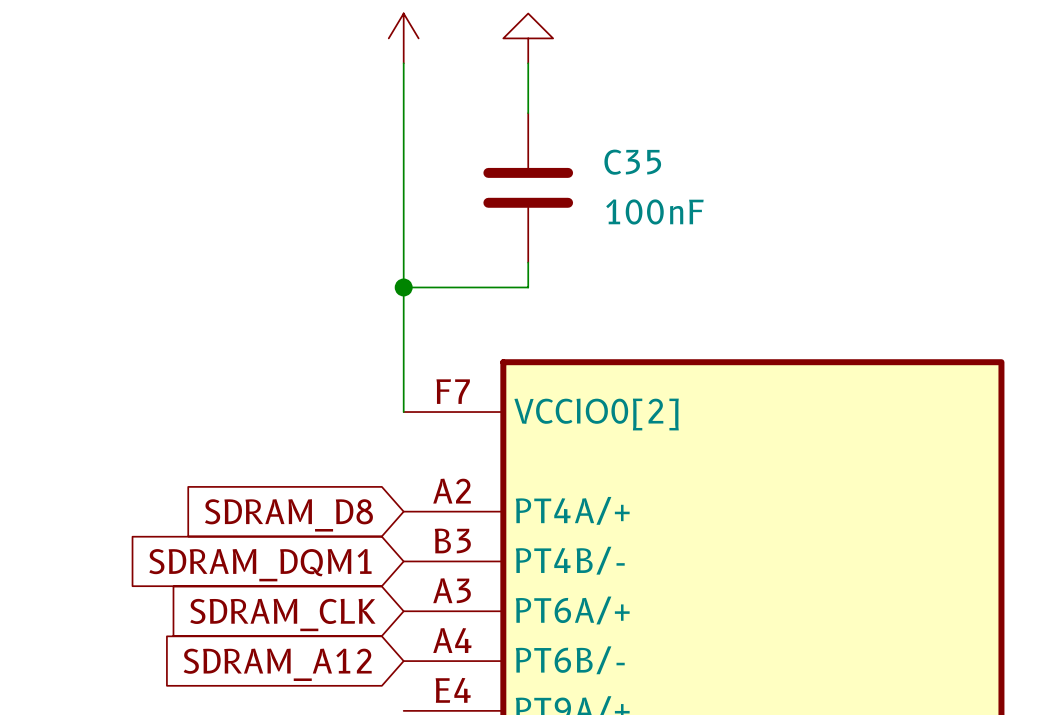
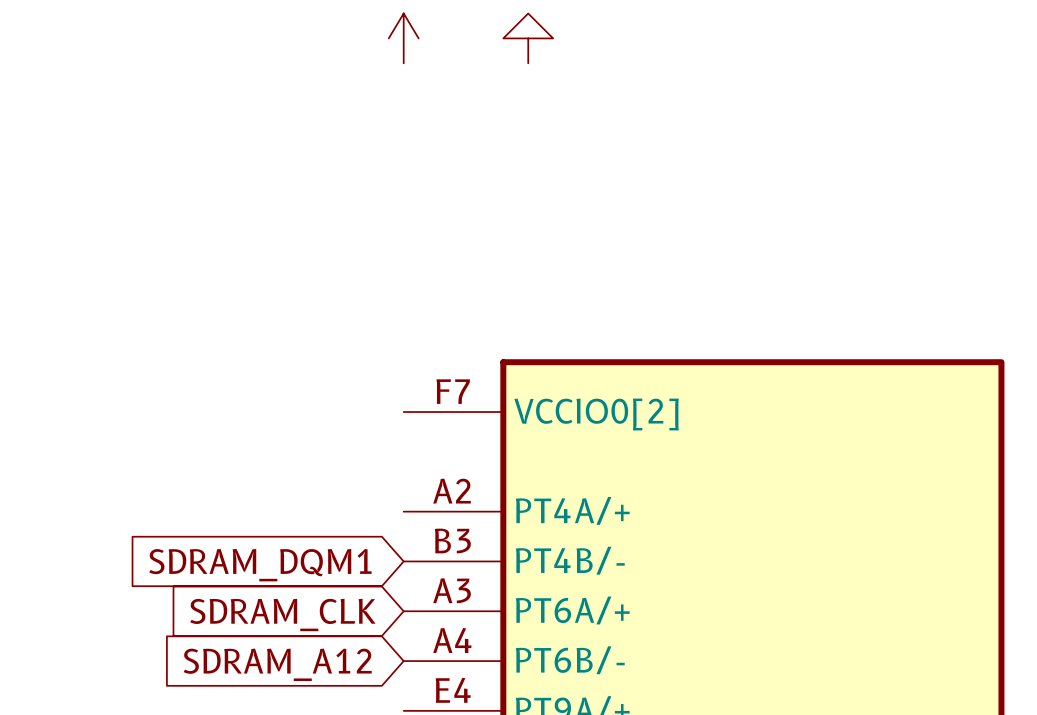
wire: (403, 63) (403, 412) -> none
wire: (528, 63) (528, 113) -> none
C35: 100nF (528, 187) -> none
wire: (528, 262) (528, 287) (403, 287) -> none
junction: (403, 287) -> none
global label: SDRAM_D8 (288, 515) -> none

